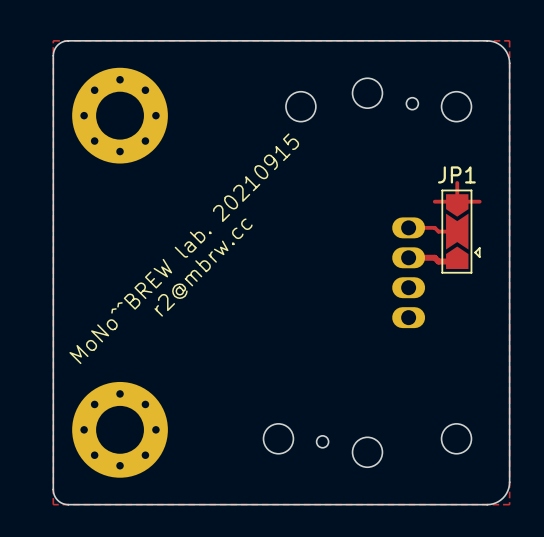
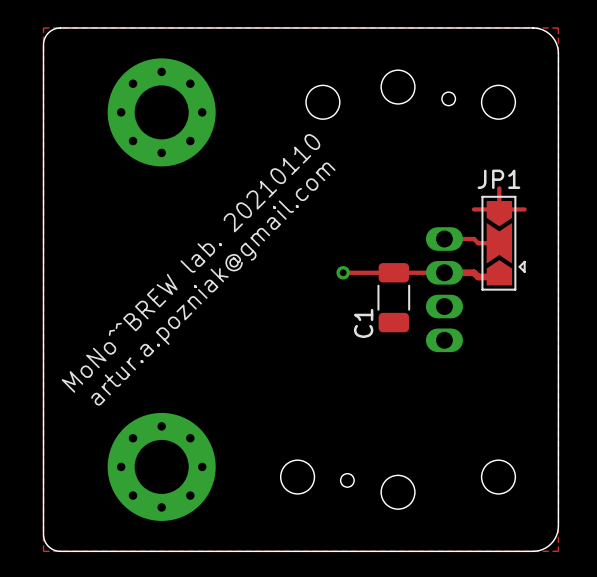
part position: (120, 115) -> (161, 112)
text: MoNo^^BREW lab. 20210915 (184, 248) -> MoNo^^BREW lab. 20210110 (190, 263)
track: none -> (343, 272) (444, 272)
via: none -> (343, 272)
text: r2@mbrw.cc (203, 267) -> artur.a.pozniak@gmail.com (213, 284)
C1: none -> (393, 297)
part position: (120, 429) -> (161, 466)

